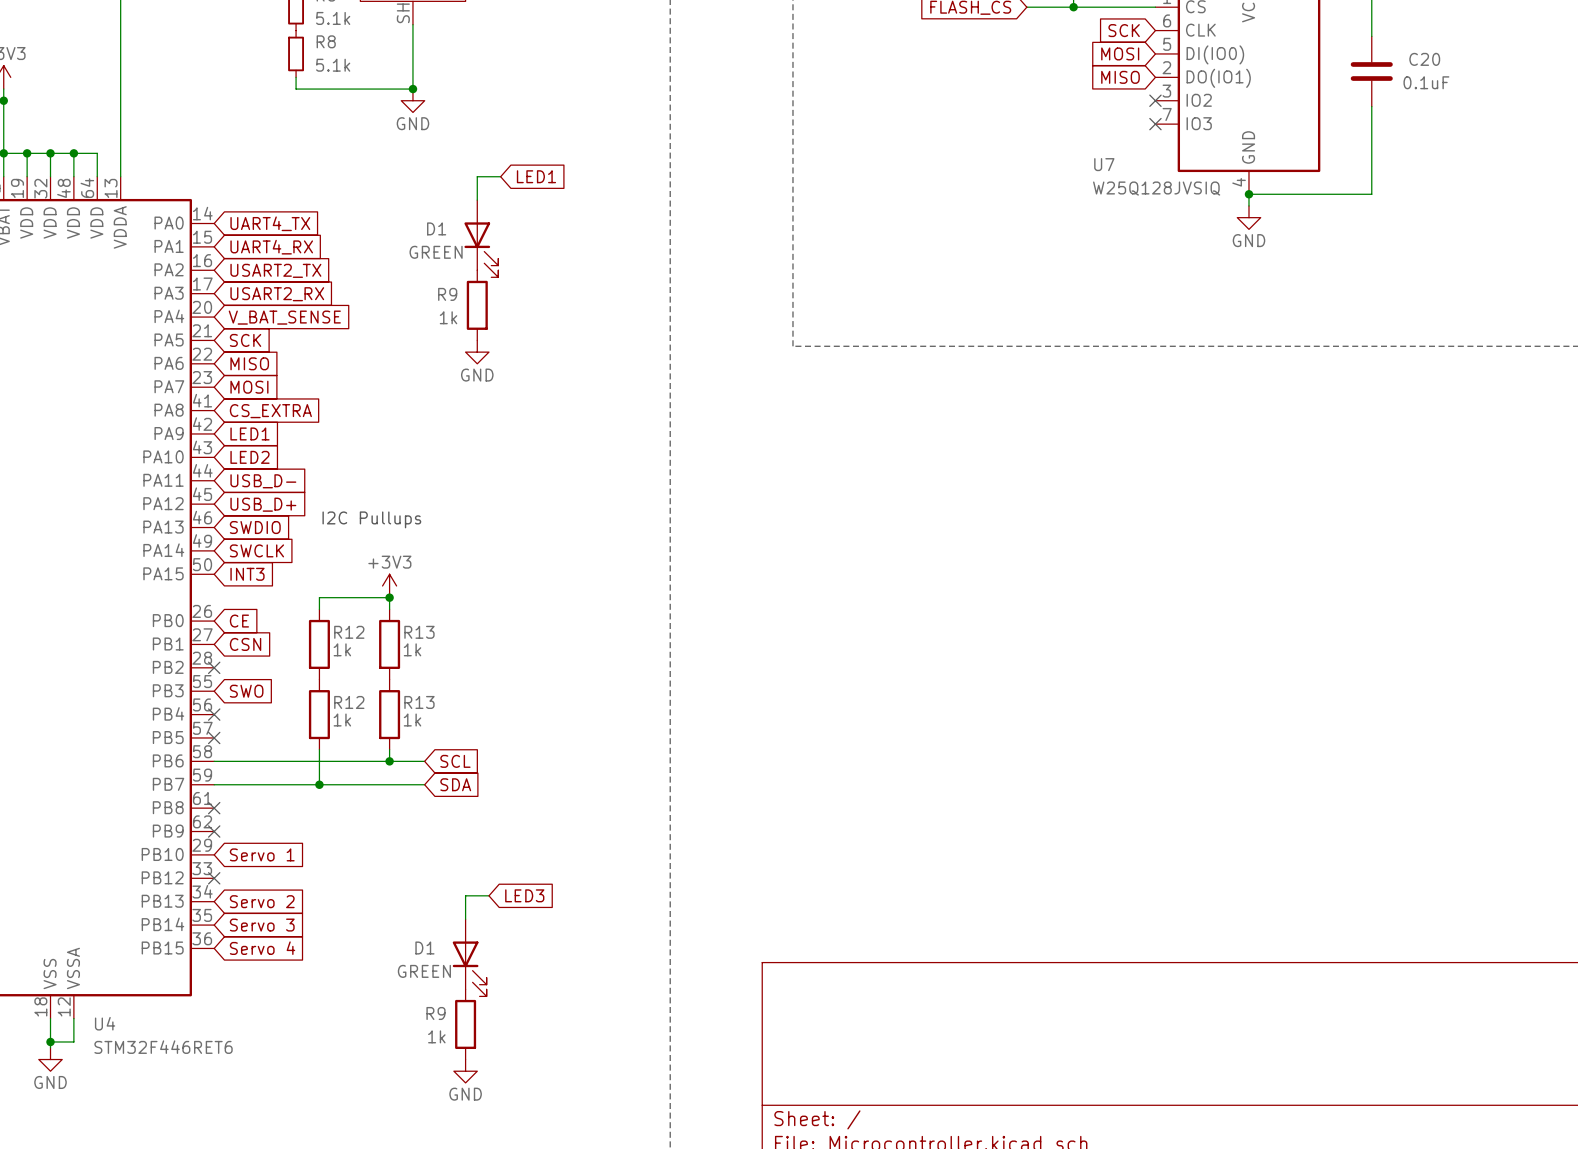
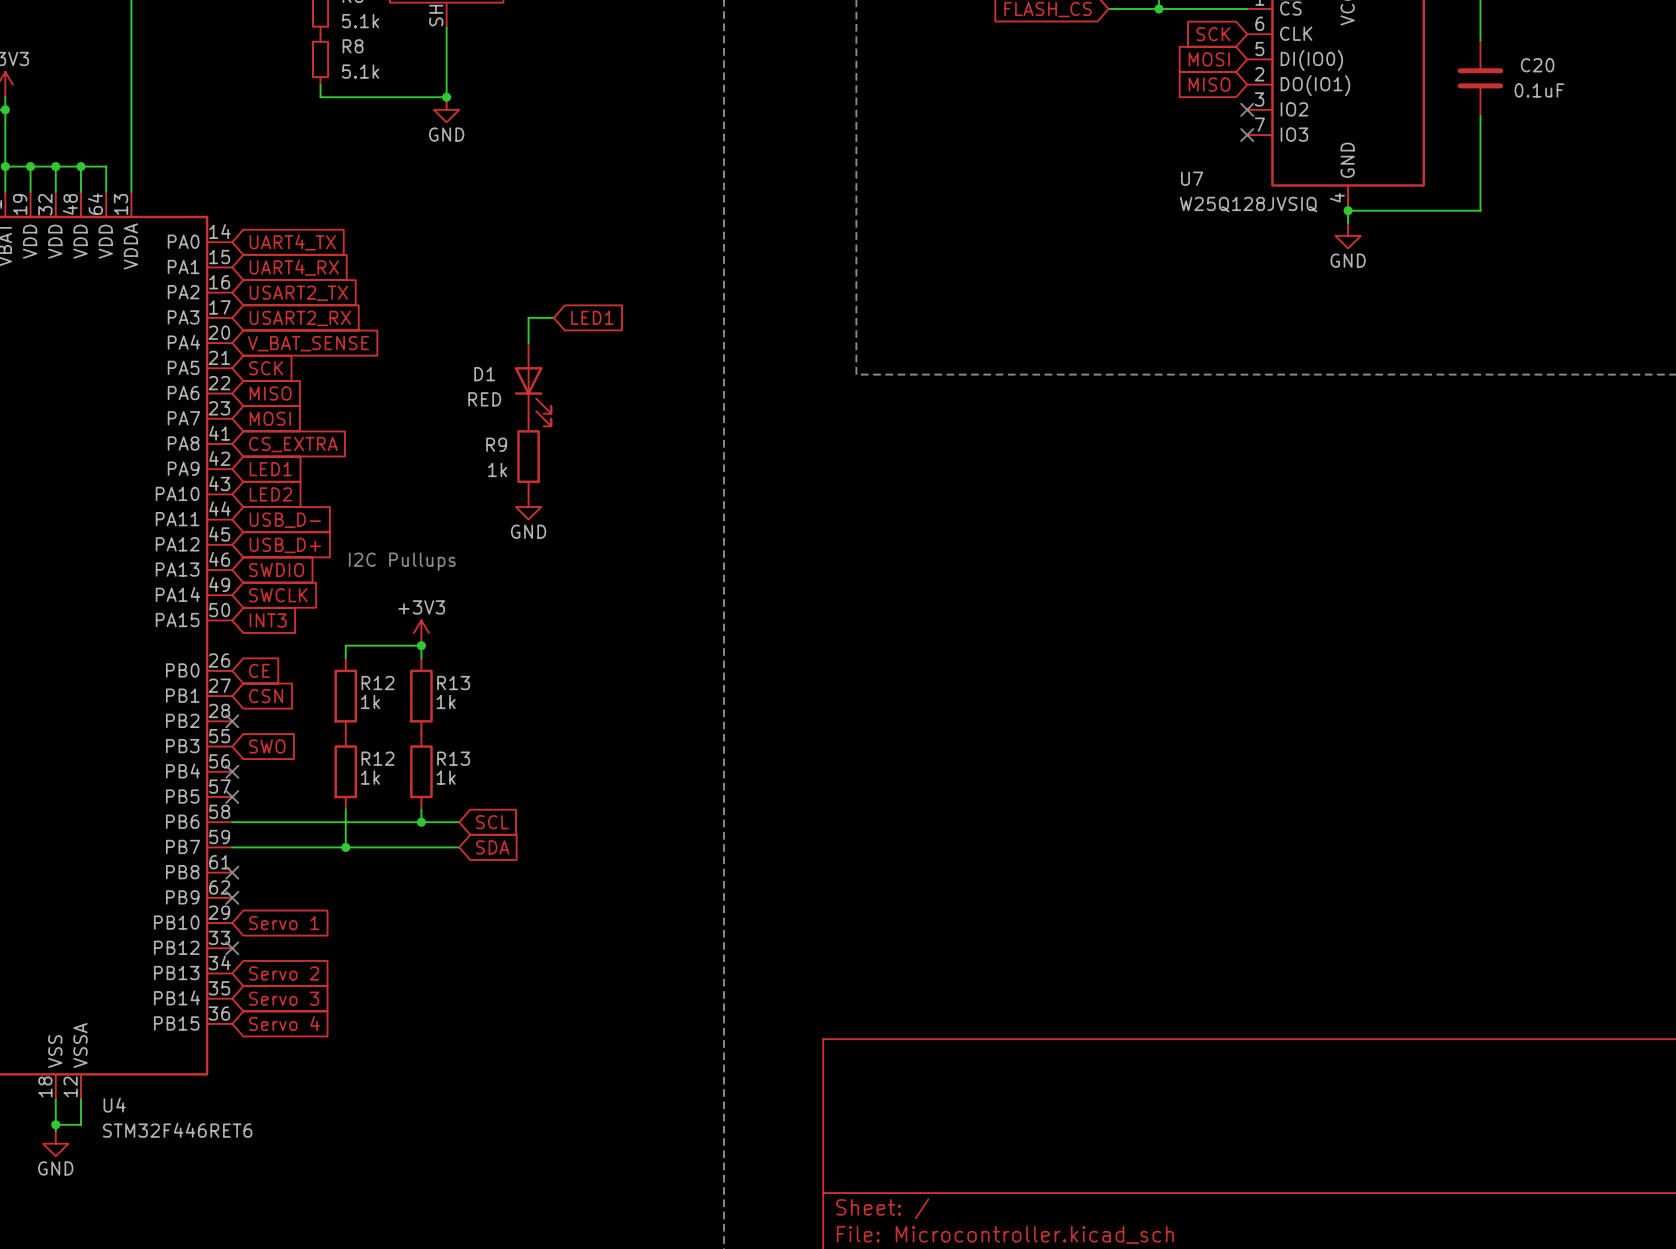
wire: (500, 176) (477, 176) (477, 200) -> (553, 317) (528, 317) (528, 343)
global label position: LED1 (536, 176) -> LED1 (592, 317)
D1: GREEN (481, 238) -> none
R9 position: (477, 305) -> (528, 456)
power symbol position: GND (477, 352) -> GND (528, 507)
D1: none -> RED (532, 384)
wire: (488, 895) (465, 895) (465, 919) -> none
global label: LED3 (524, 895) -> none
D1: GREEN (469, 957) -> none
R9: 1k (465, 1024) -> none
power symbol: GND (465, 1071) -> none

